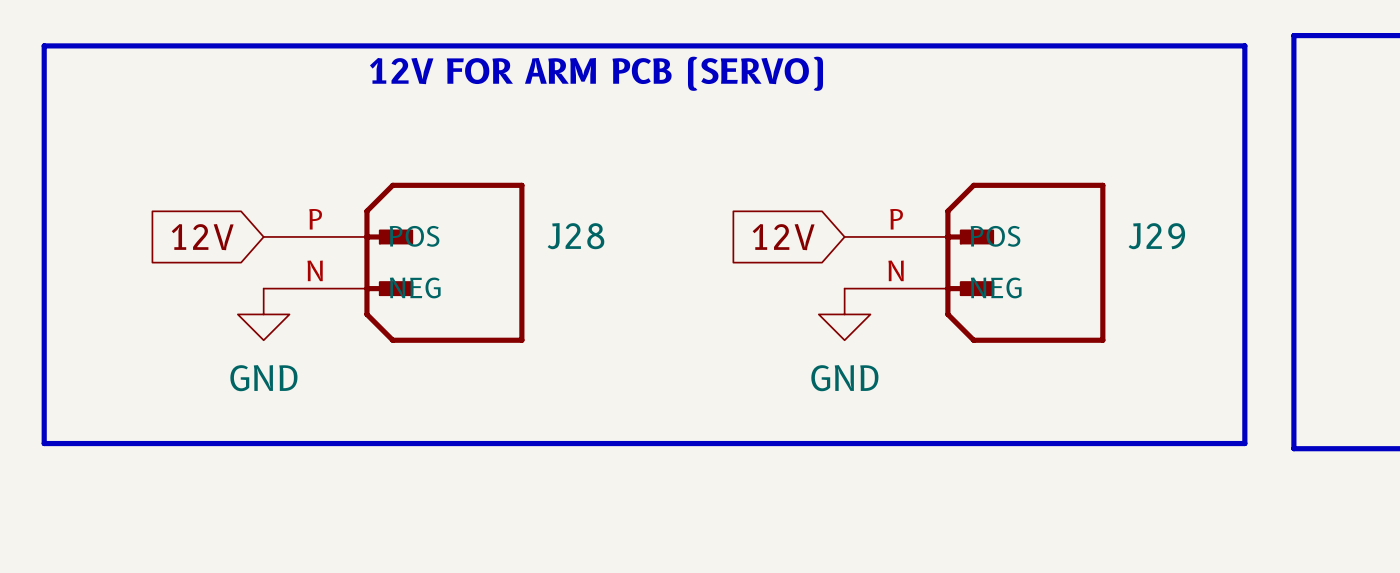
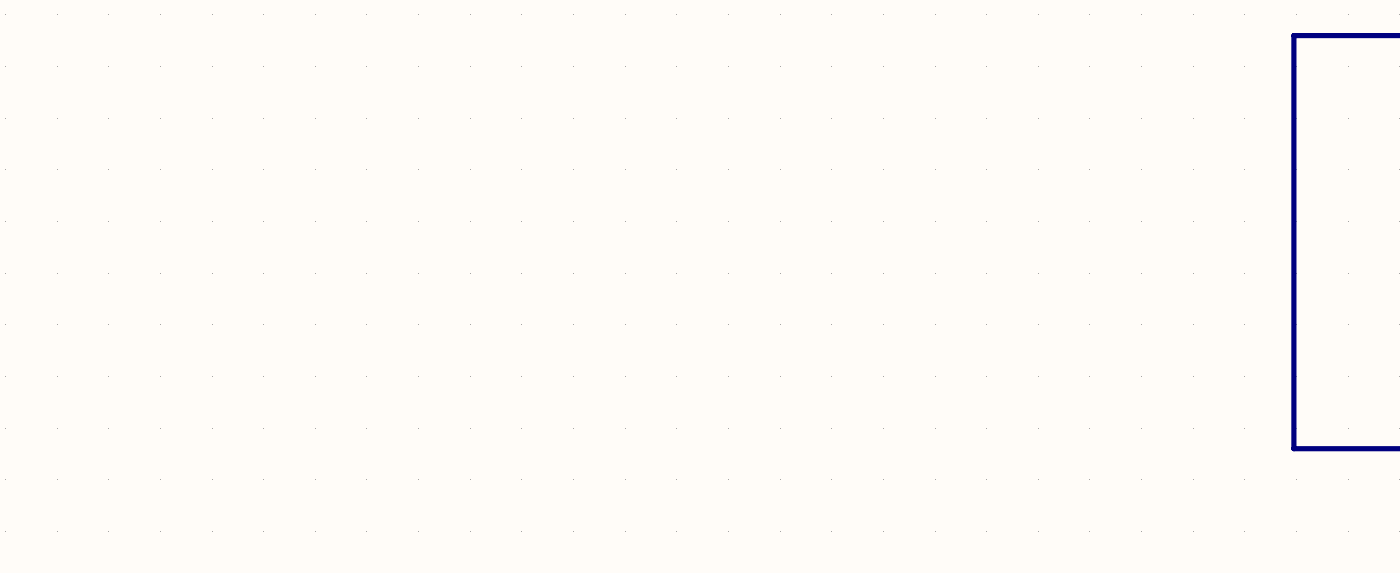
line: (44, 45) (1244, 45) (1244, 443) (44, 443) (44, 45) -> none
text: 12V FOR ARM PCB (SERVO) (596, 73) -> none
global label: 12V (202, 237) -> none
global label: 12V (783, 237) -> none
J28: (394, 262) -> none
J29: (975, 262) -> none
power symbol: GND (263, 314) -> none
power symbol: GND (844, 314) -> none

